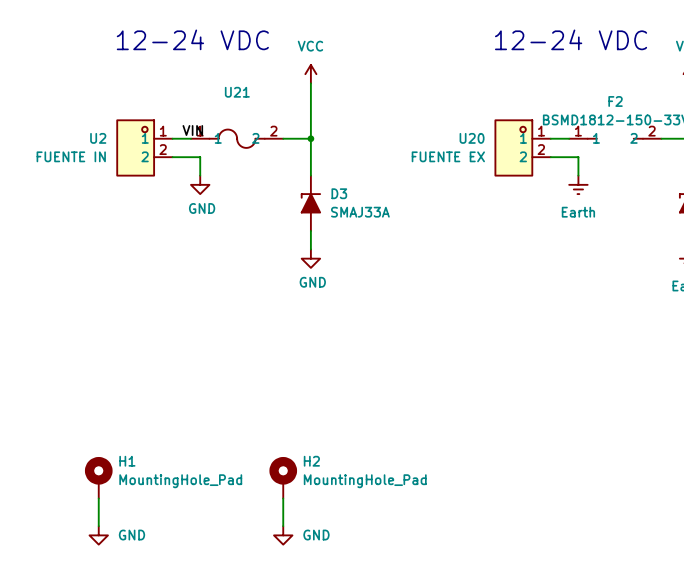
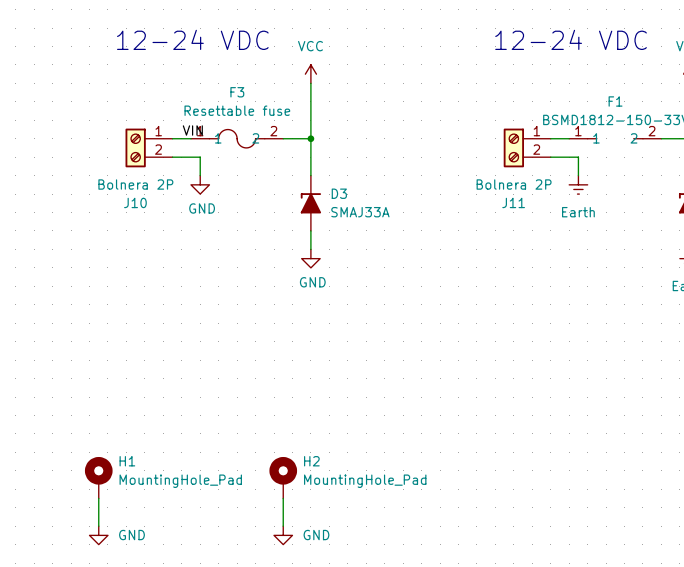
U21 name: U21 (237, 92) -> F3 (237, 92)
F2 name: F2 (615, 101) -> F1 (615, 101)
U21 value: none -> Resettable fuse (237, 110)
U2: FUENTE IN (144, 147) -> none
J10: none -> Bolnera 2P (149, 147)
U20: FUENTE EX (523, 147) -> none
J11: none -> Bolnera 2P (527, 147)

